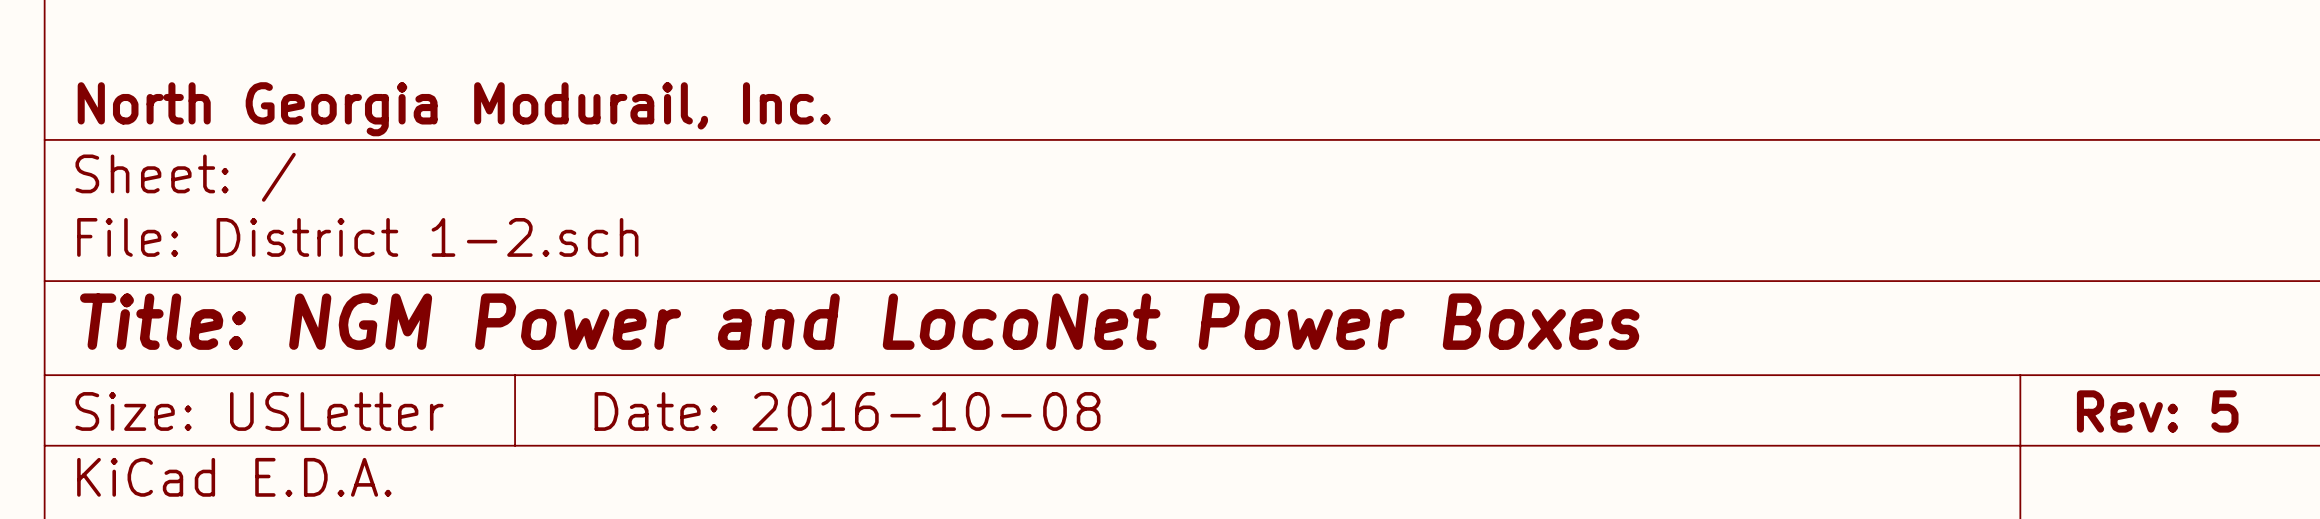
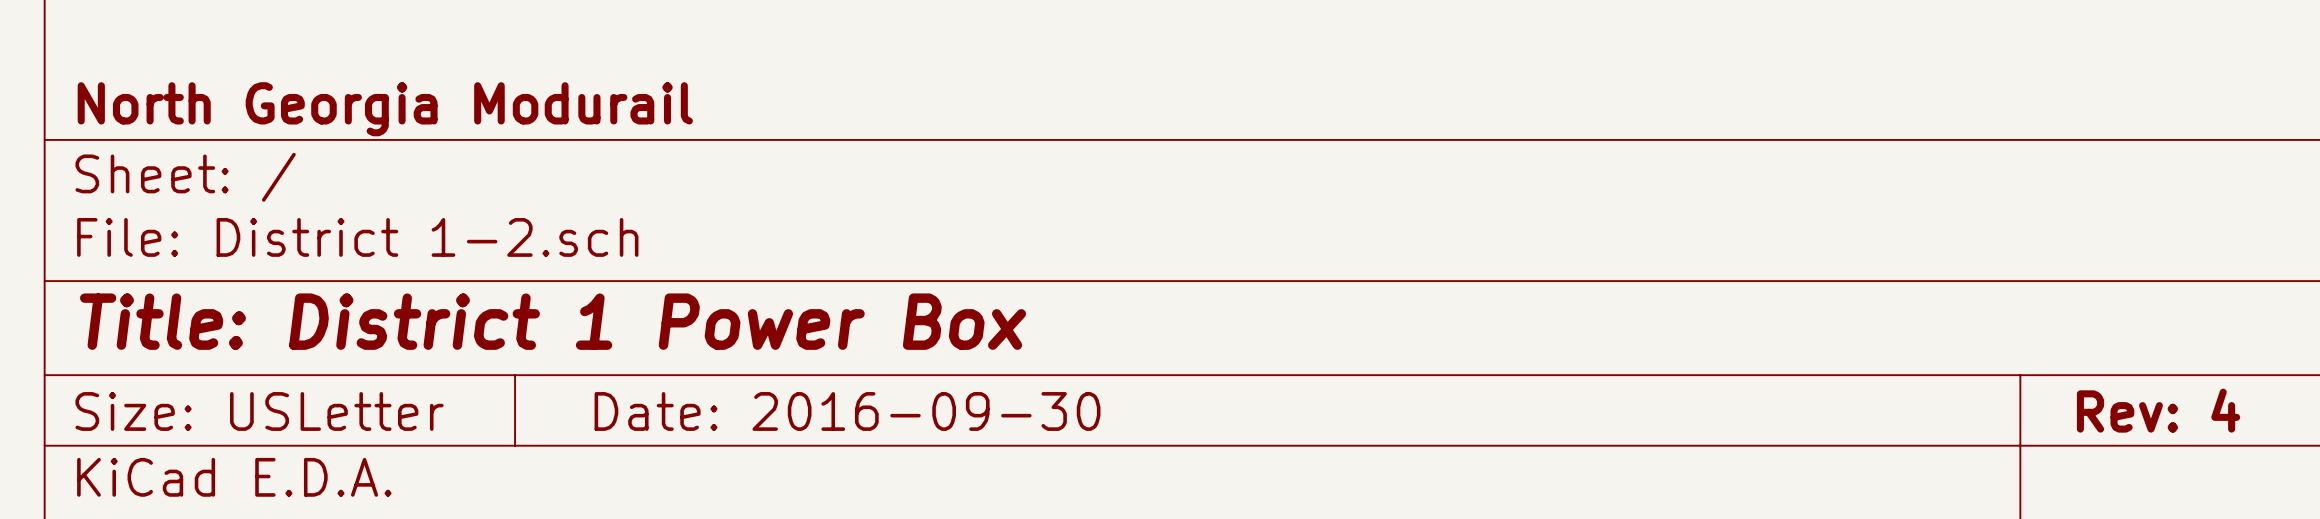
title block: North Georgia Modurail, Inc. (454, 109) -> North Georgia Modurail (385, 109)
title block: Title: NGM Power and LocoNet Power Boxes (859, 321) -> Title: District 1 Power Box (553, 321)
title block: Date: 2016-10-08 (847, 411) -> Date: 2016-09-30 (847, 411)
title block: Rev: 5 (2157, 411) -> Rev: 4 (2158, 410)

